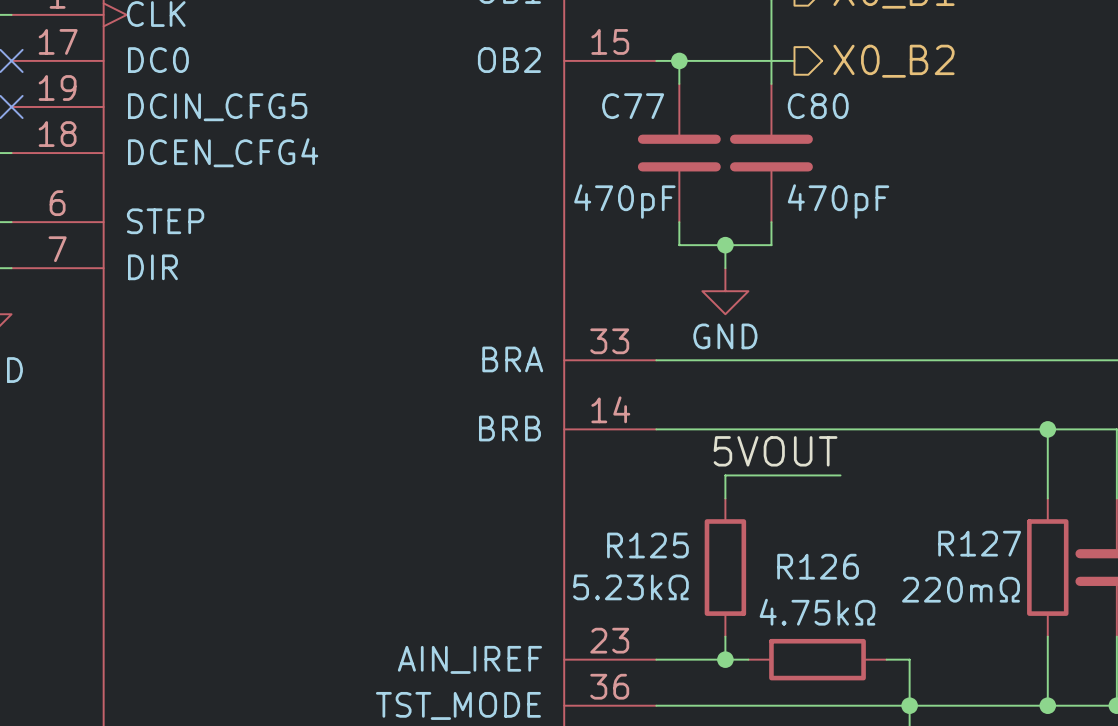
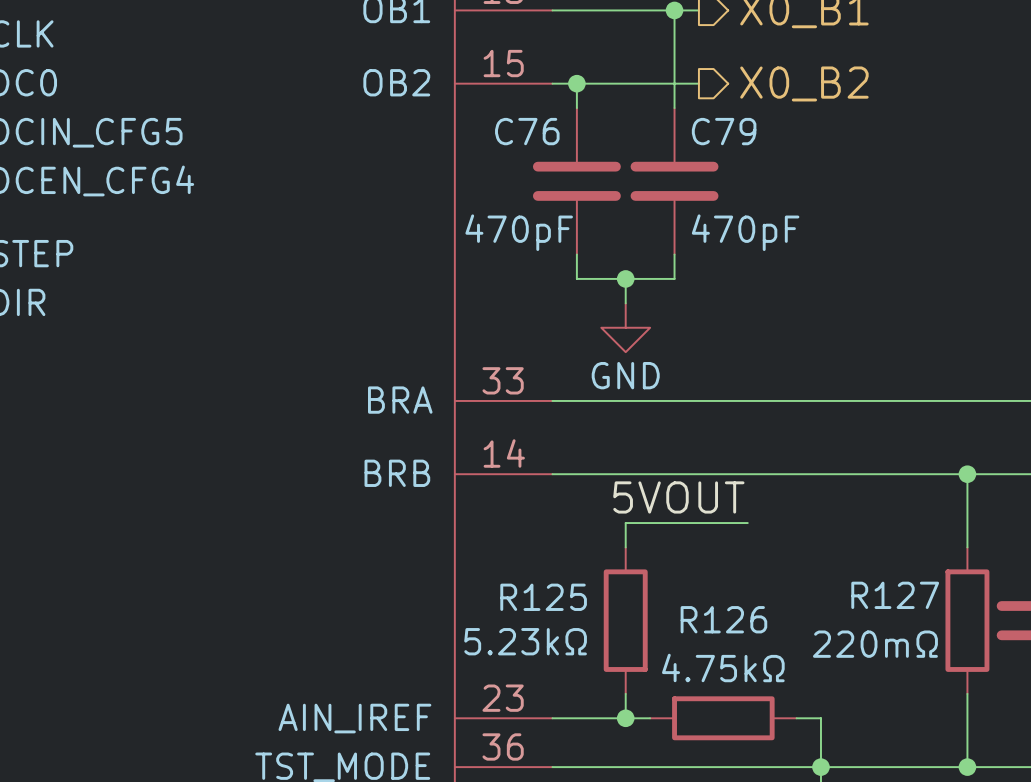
C77 name: C77 (633, 106) -> C76 (527, 131)
C80 name: C80 (818, 106) -> C79 (724, 131)

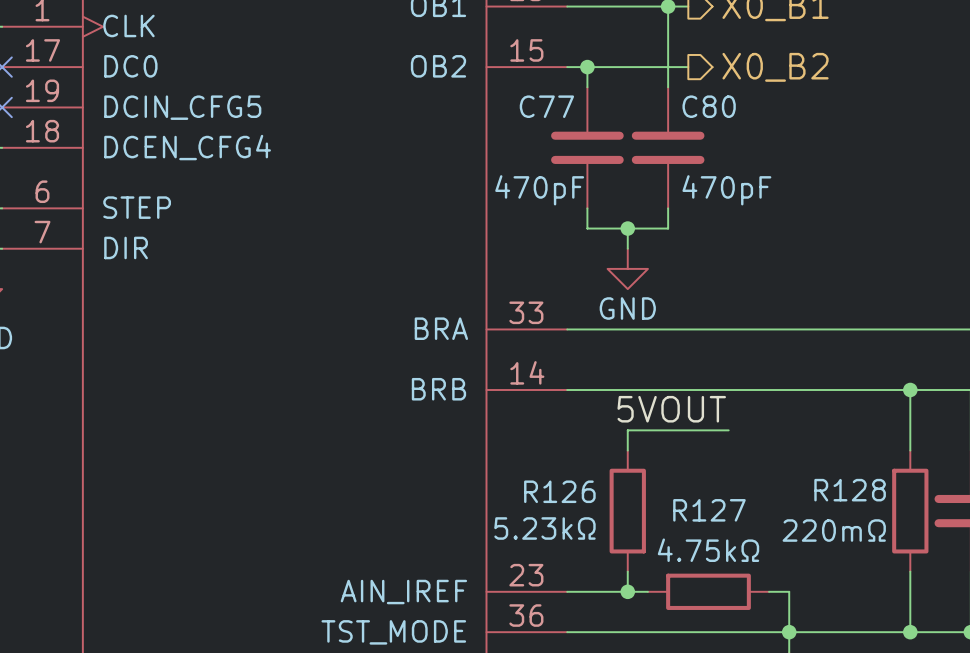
C76 name: C76 (527, 131) -> C77 (546, 106)
C79 name: C79 (724, 131) -> C80 (709, 106)
R127 name: R127 (895, 595) -> R128 (850, 490)
R125 name: R125 (543, 597) -> R126 (559, 491)
R126 name: R126 (723, 619) -> R127 (709, 510)

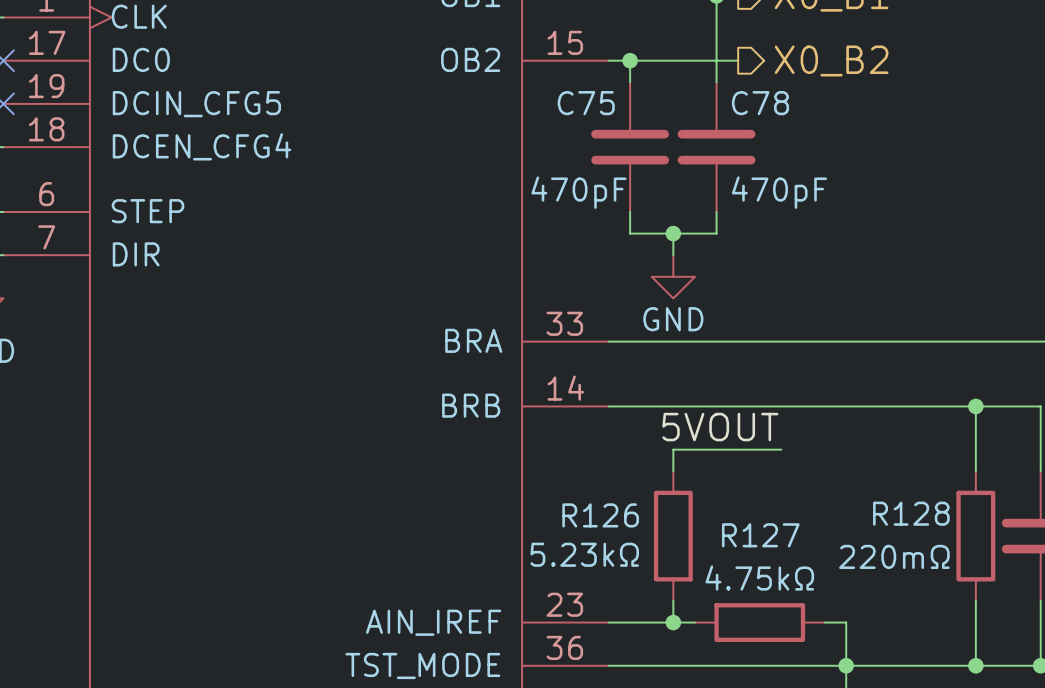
C77 name: C77 (546, 106) -> C75 (586, 103)
C80 name: C80 (709, 106) -> C78 (760, 103)

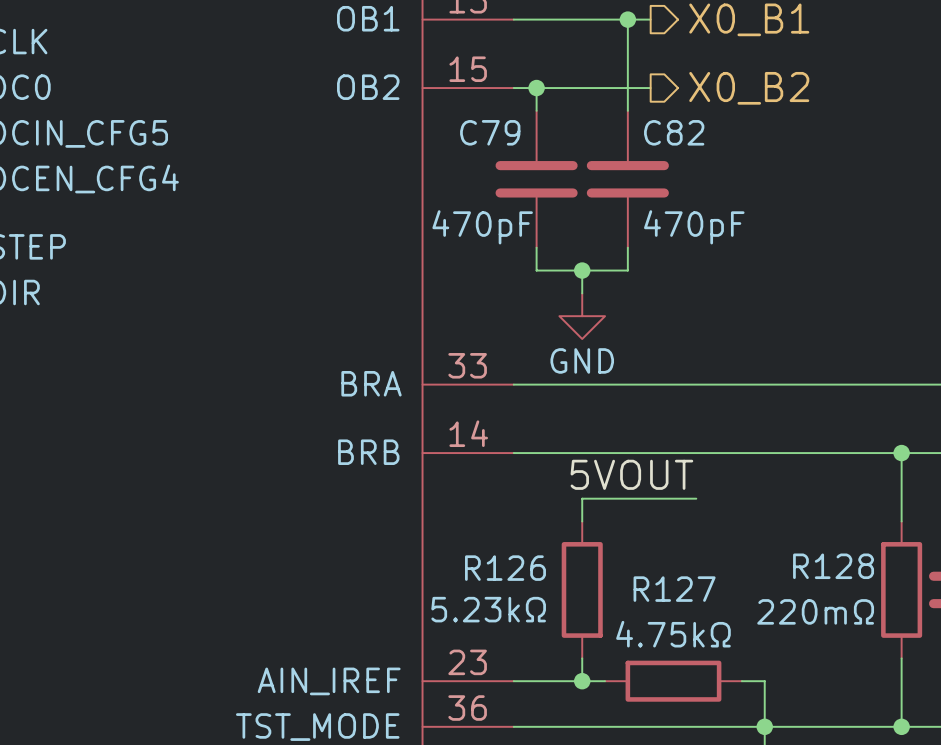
C75 name: C75 (586, 103) -> C79 (490, 132)
C78 name: C78 (760, 103) -> C82 (674, 132)

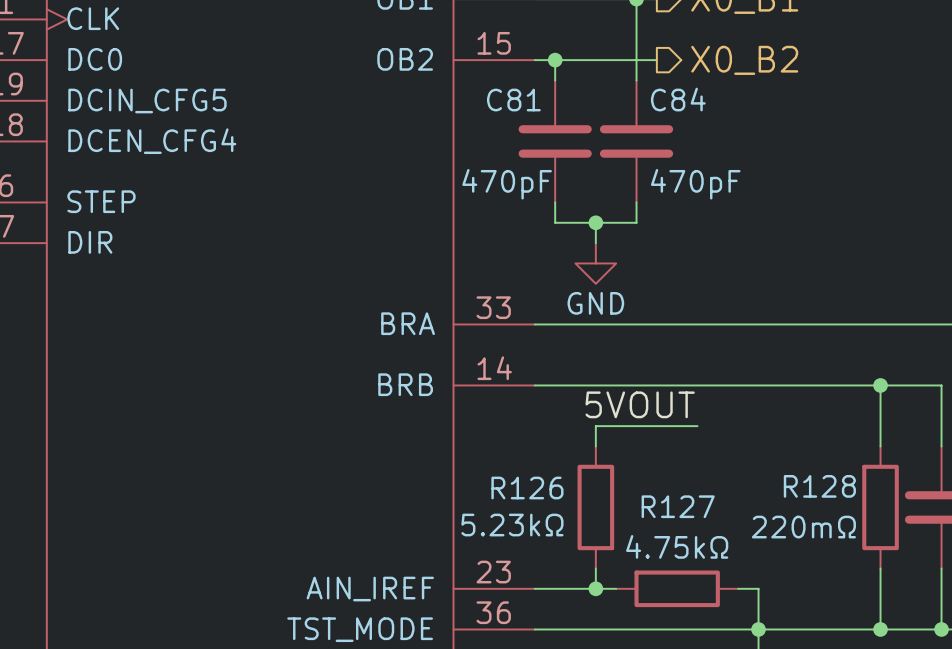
C79 name: C79 (490, 132) -> C81 (513, 100)
C82 name: C82 (674, 132) -> C84 (678, 99)

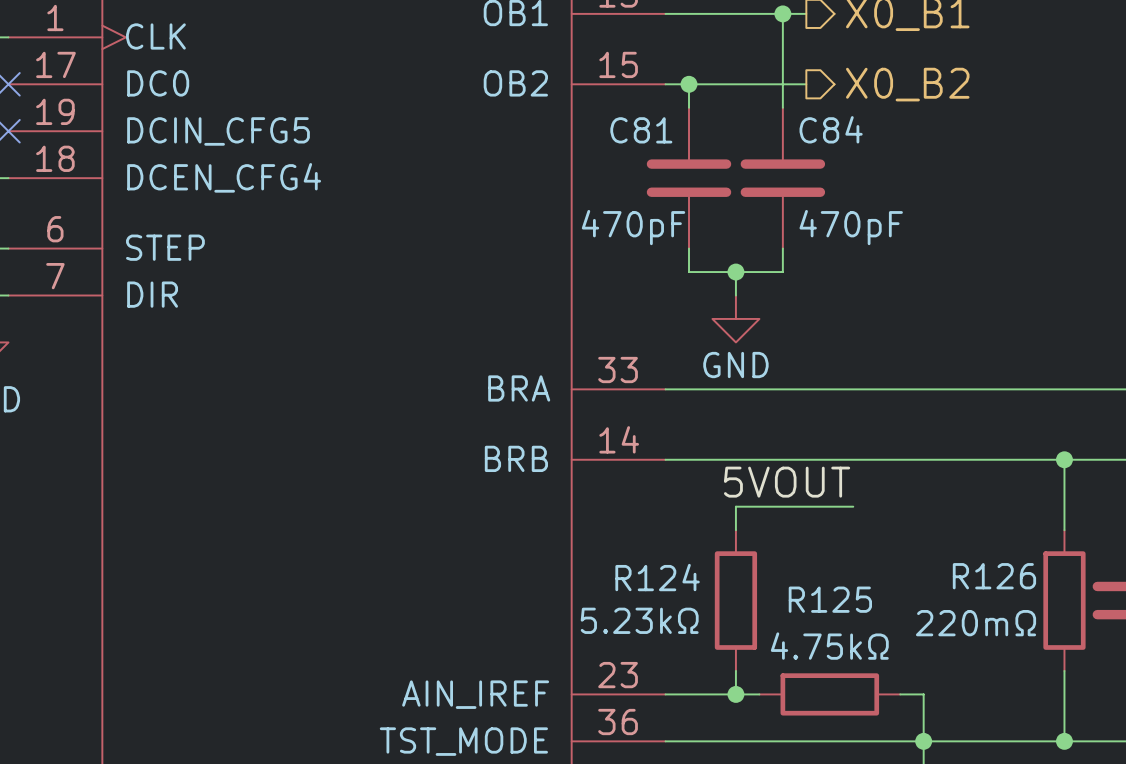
R128 name: R128 (819, 486) -> R126 (994, 576)
R126 name: R126 (527, 488) -> R124 (657, 577)
R127 name: R127 (678, 506) -> R125 (830, 599)

